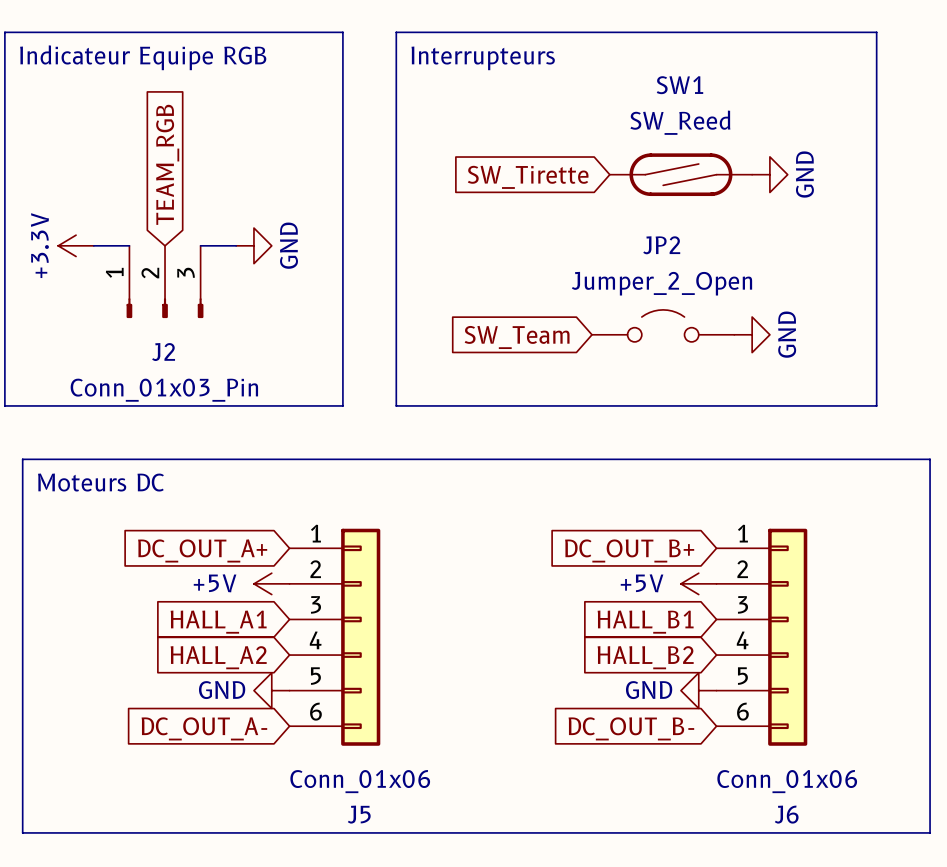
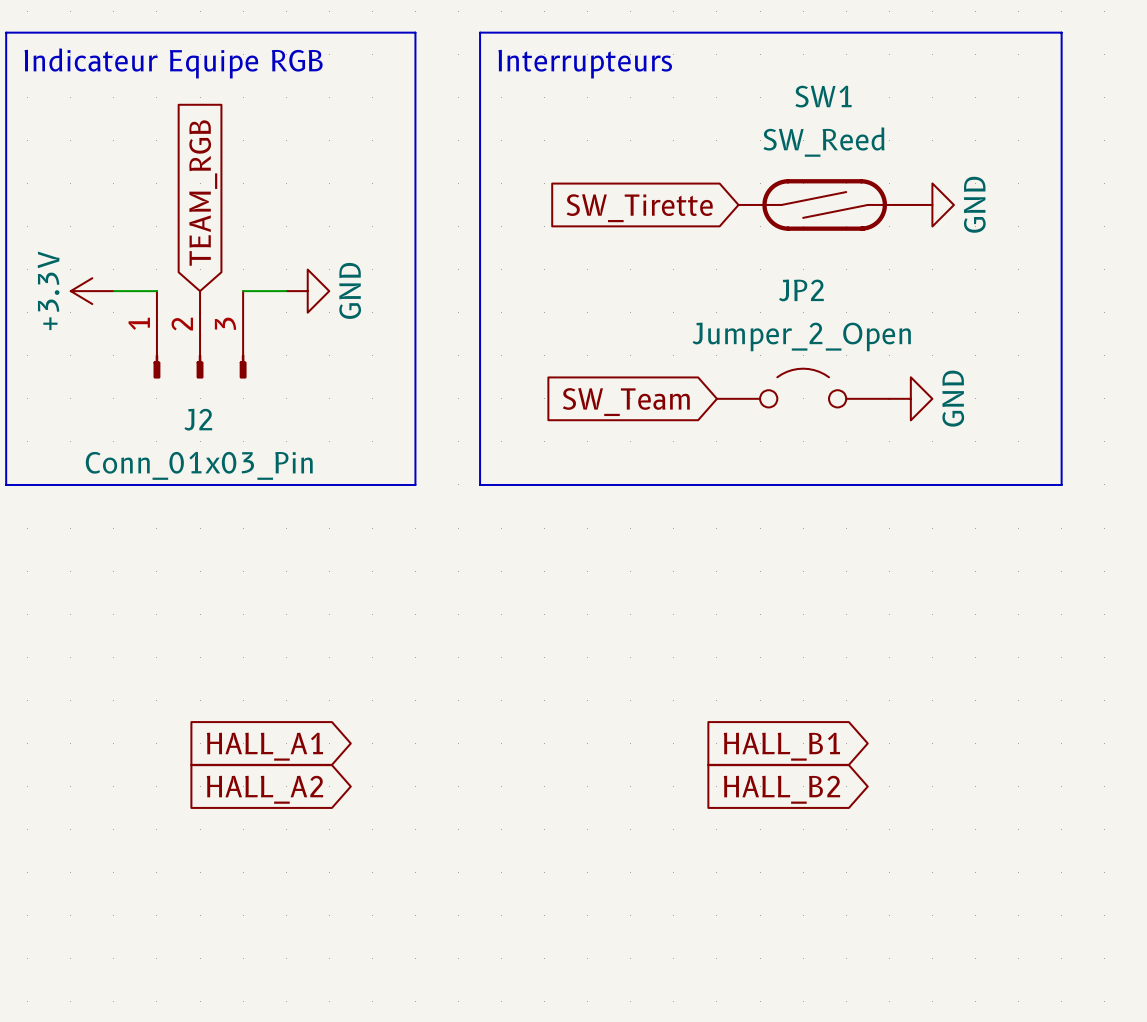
line: (22, 459) (930, 459) (930, 832) (22, 832) (22, 459) -> none
text: Moteurs DC (100, 482) -> none
global label: DC_OUT_A+ (202, 550) -> none
global label: DC_OUT_B+ (629, 550) -> none
power symbol: +5V (271, 583) -> none
power symbol: +5V (698, 583) -> none
J5: Conn_01x06 (334, 637) -> none
J6: Conn_01x06 (761, 637) -> none
power symbol: GND (271, 690) -> none
power symbol: GND (698, 690) -> none
global label: DC_OUT_A- (204, 728) -> none
global label: DC_OUT_B- (631, 728) -> none

